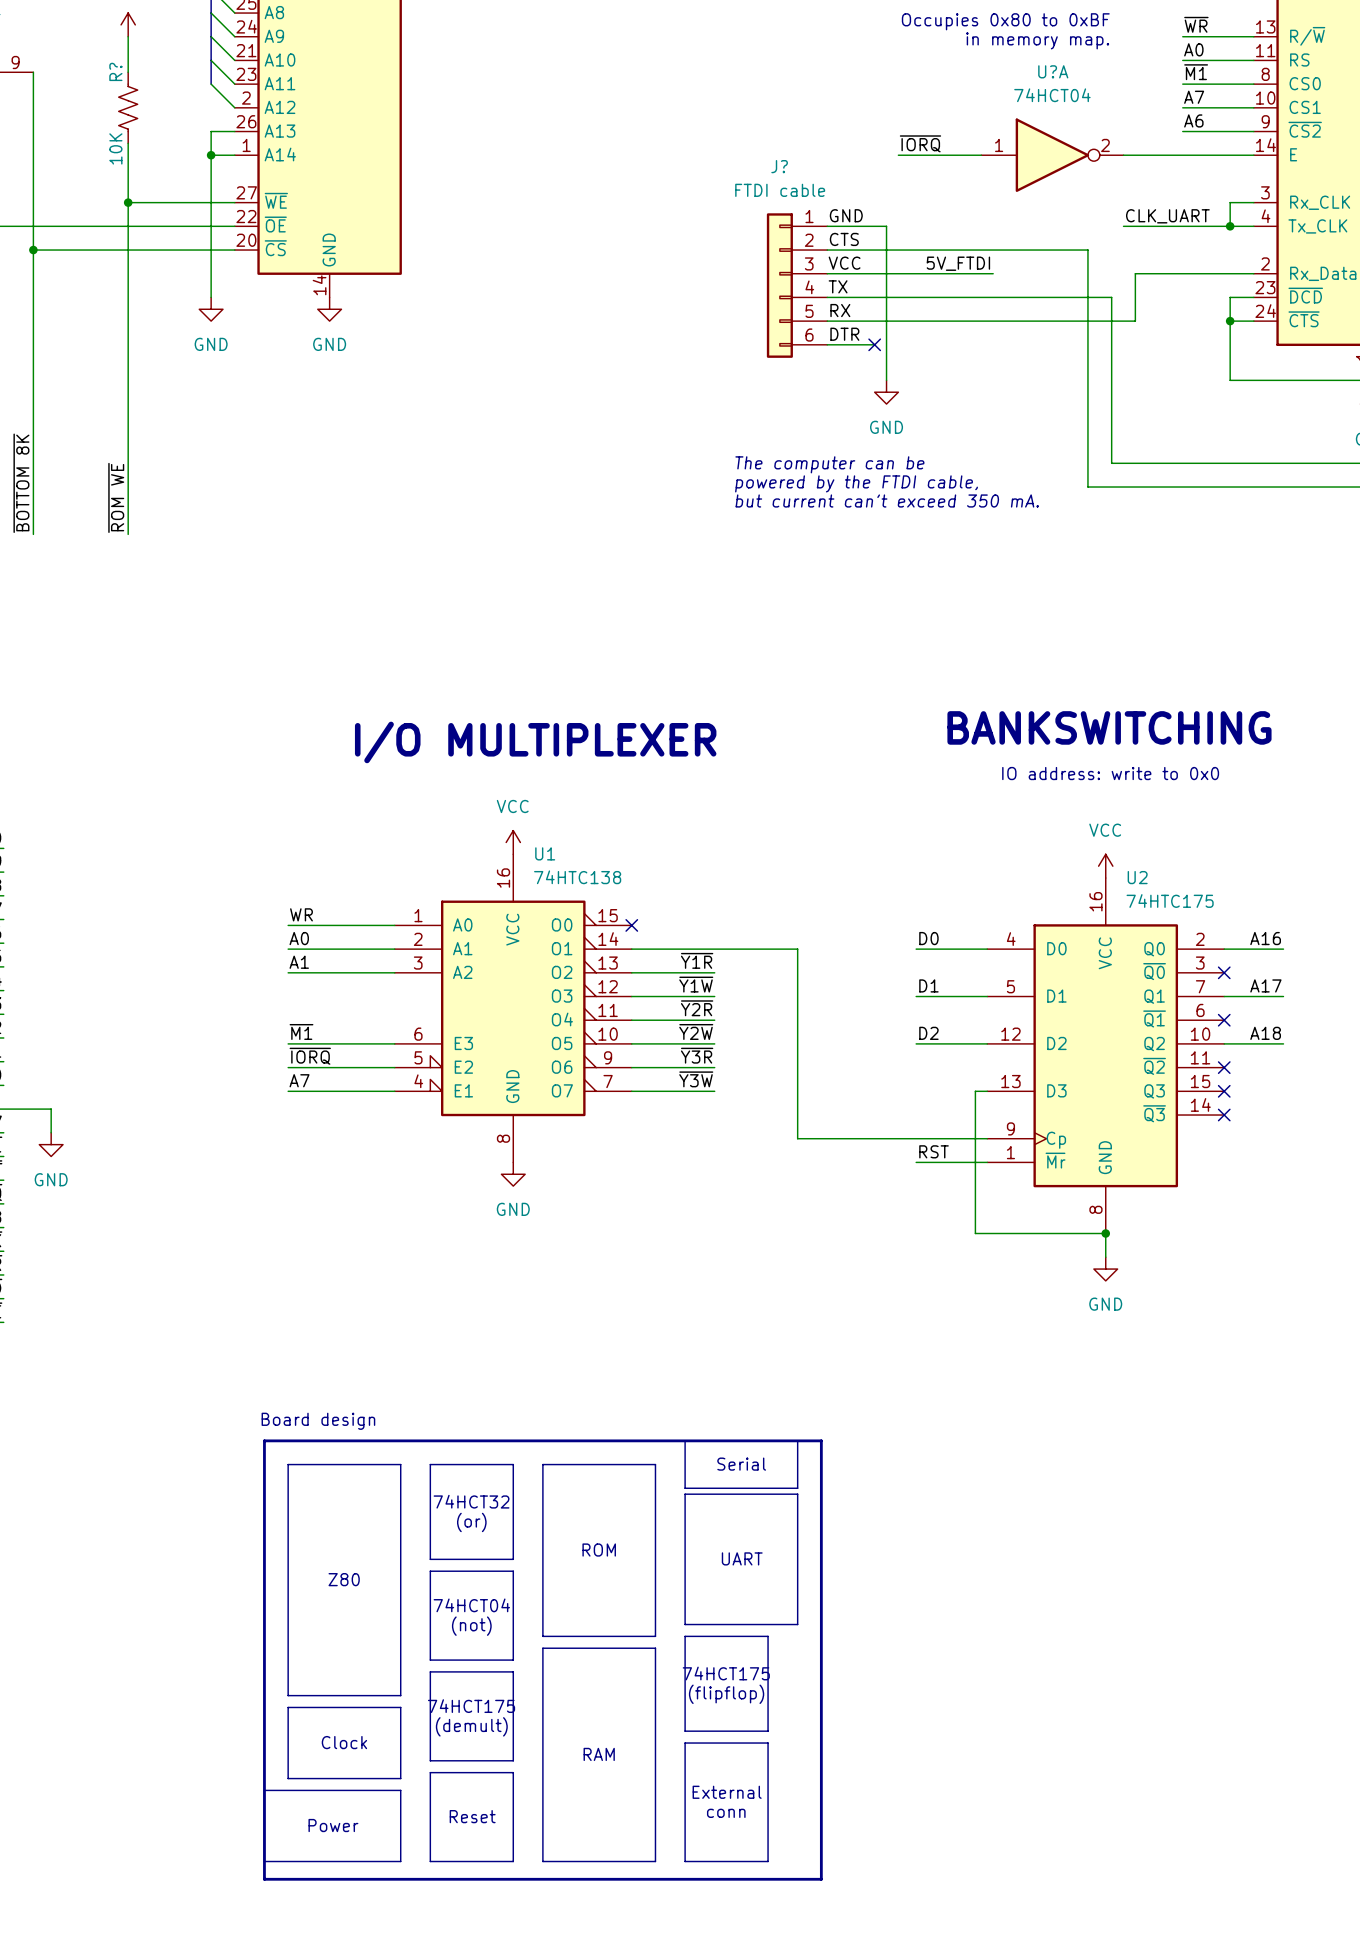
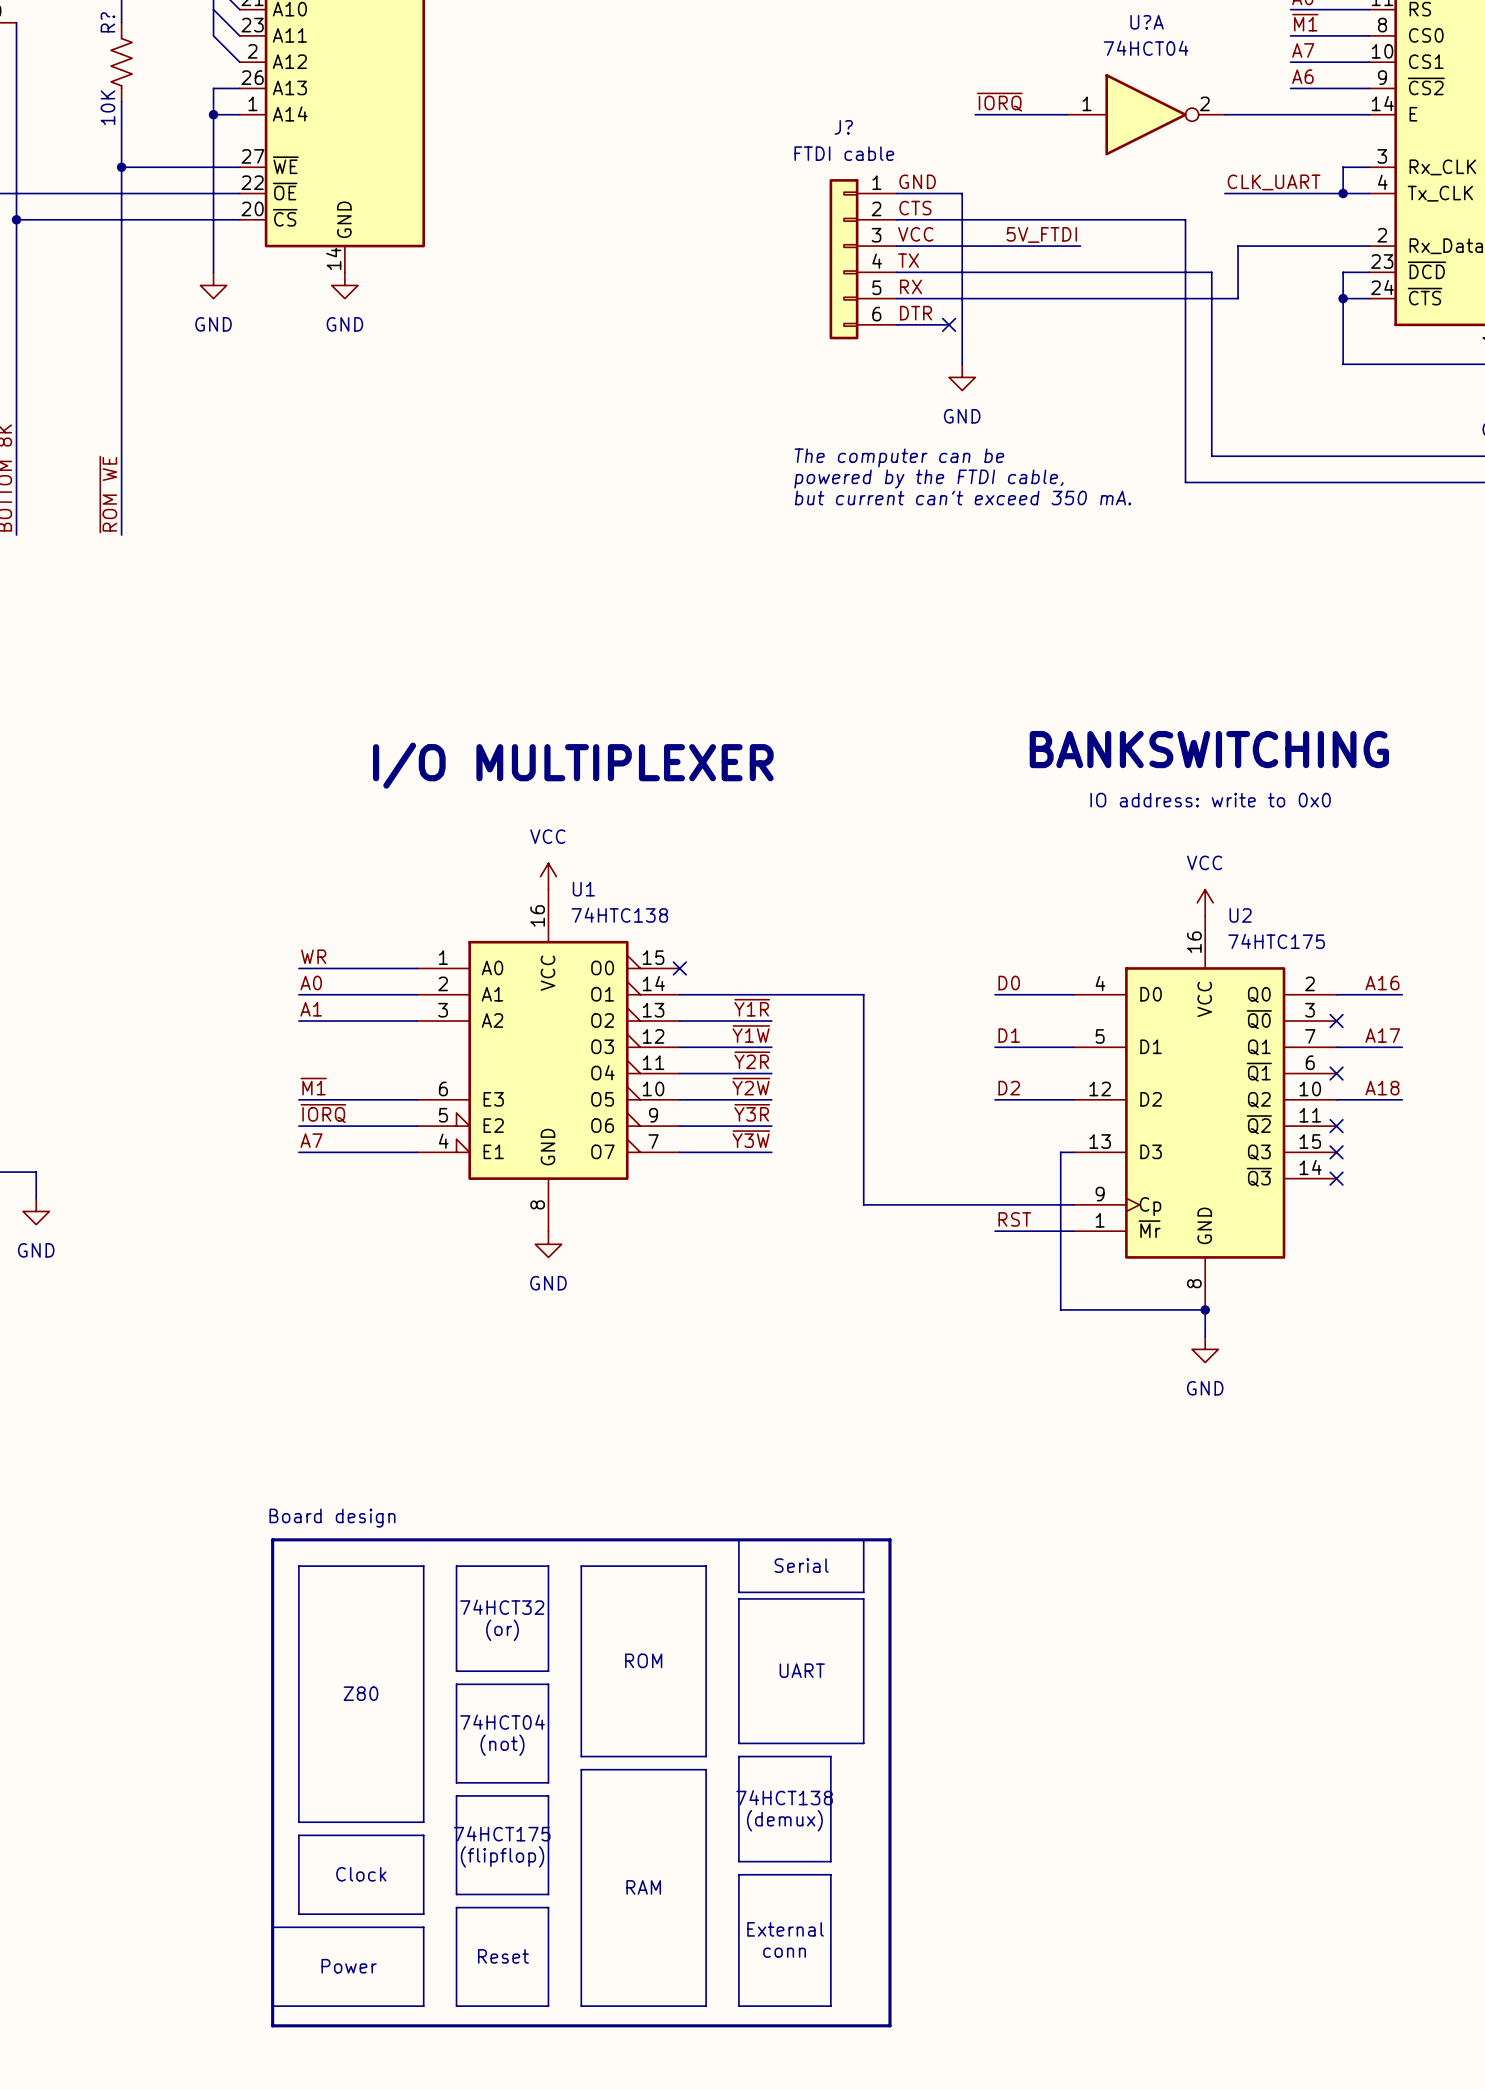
text: 74HCT175 (726, 1673) -> 74HCT138 (784, 1797)
text: (flipflop) (726, 1694) -> (demux) (784, 1820)
text: (demult) (471, 1726) -> (flipflop) (502, 1856)

